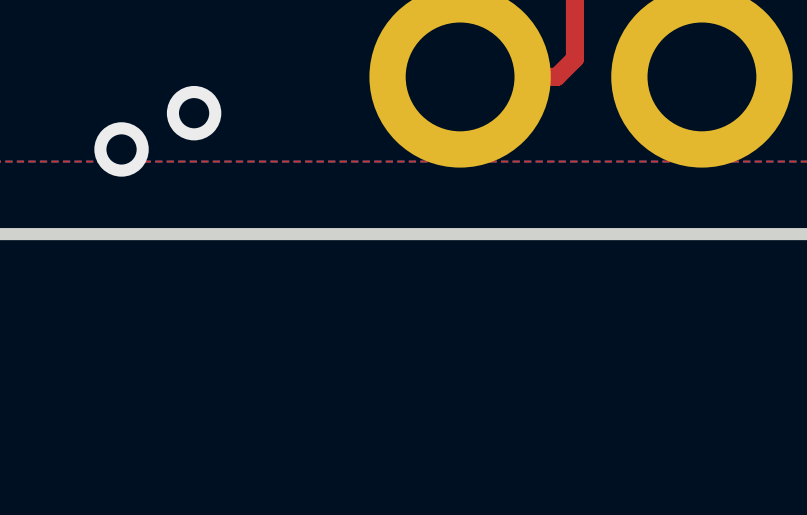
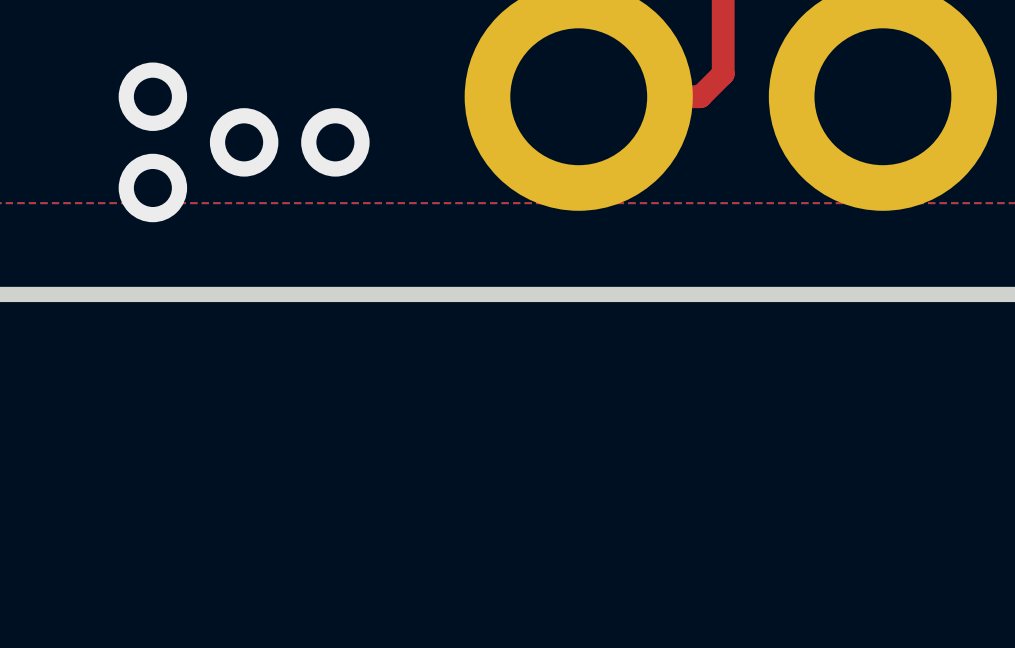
via: none -> (152, 96)
via: none -> (335, 142)

